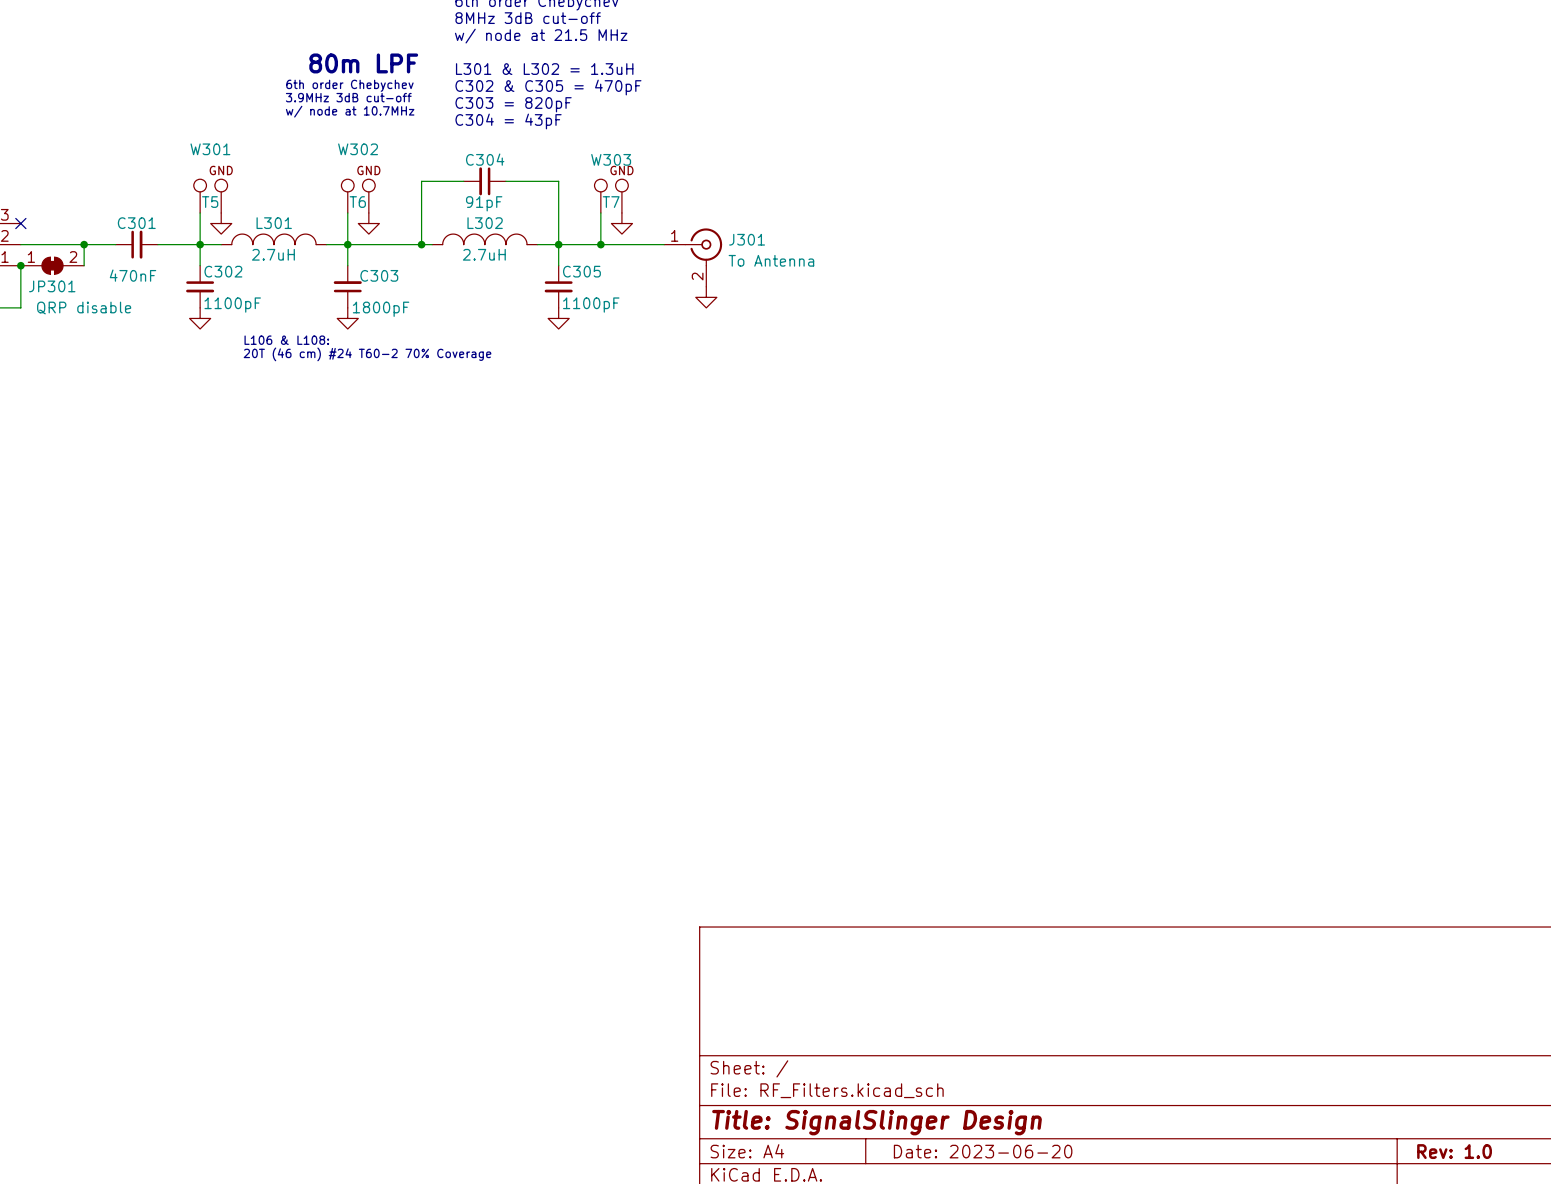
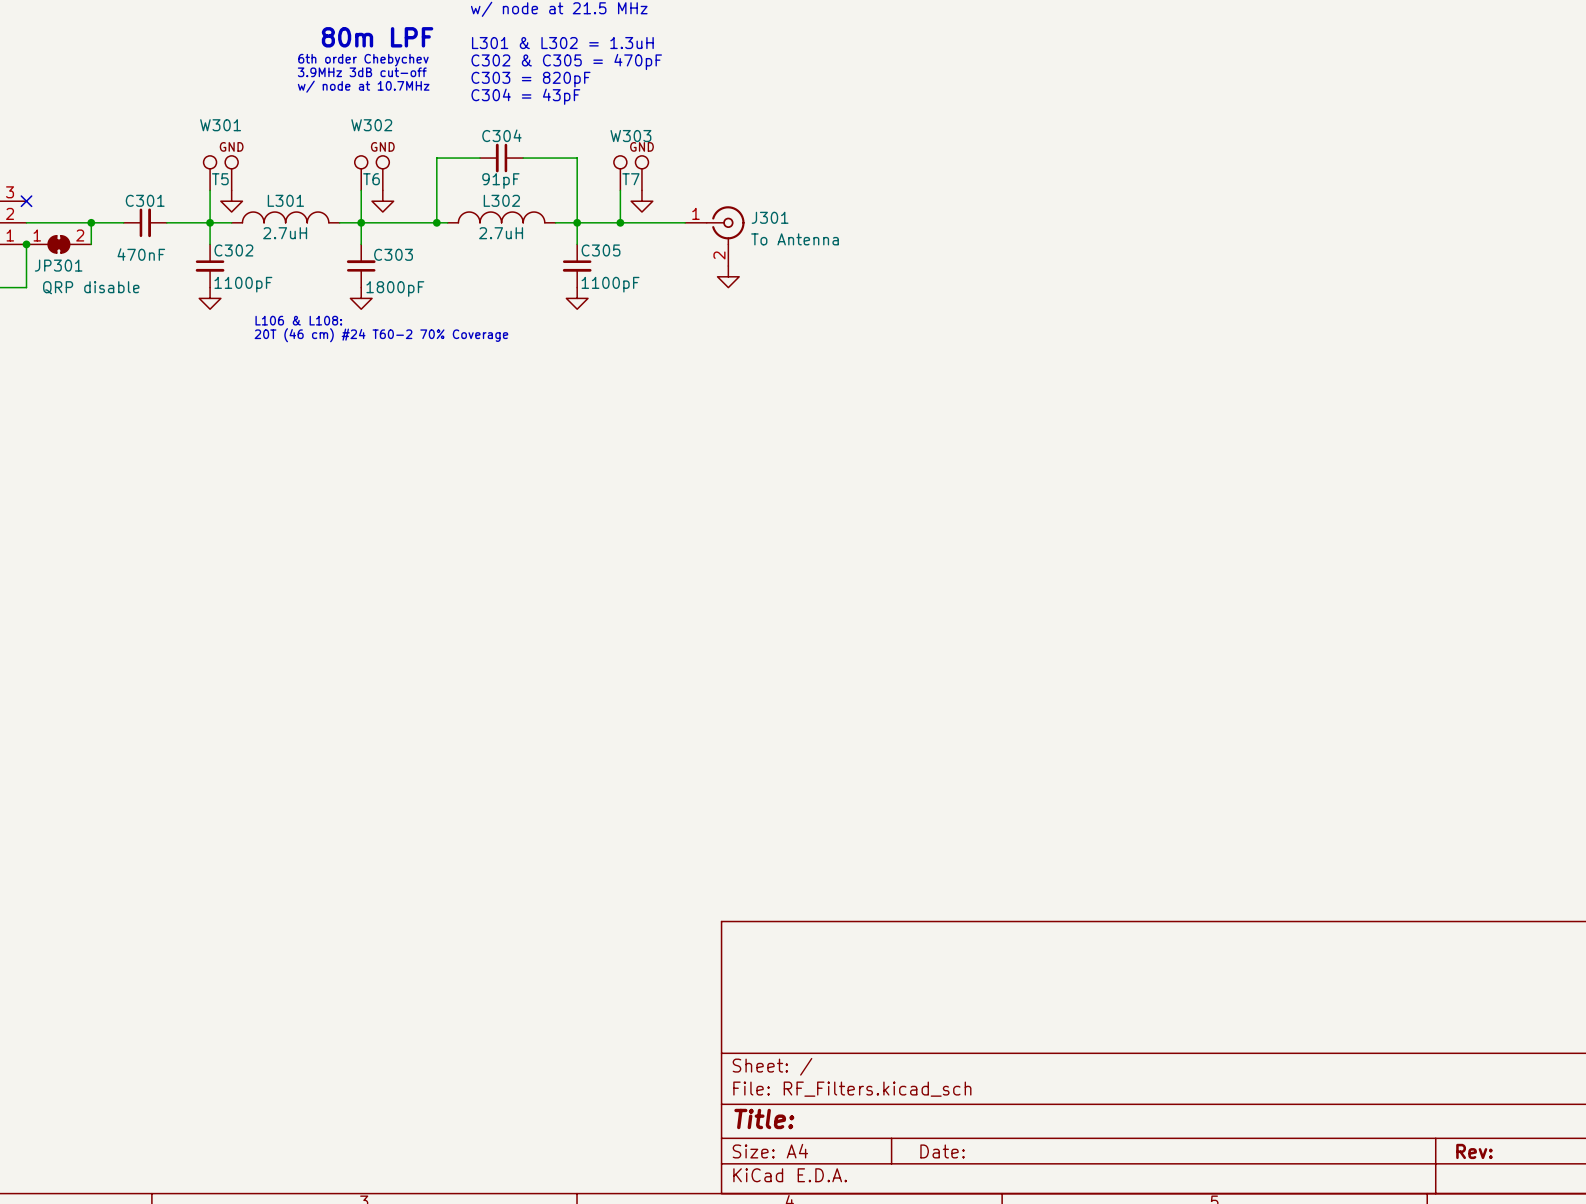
title block: Title: SignalSlinger Design (877, 1122) -> Title: (764, 1118)
title block: Date: 2023-06-20 (983, 1151) -> Date: (942, 1151)
title block: Rev: 1.0 (1454, 1151) -> Rev: (1474, 1151)

